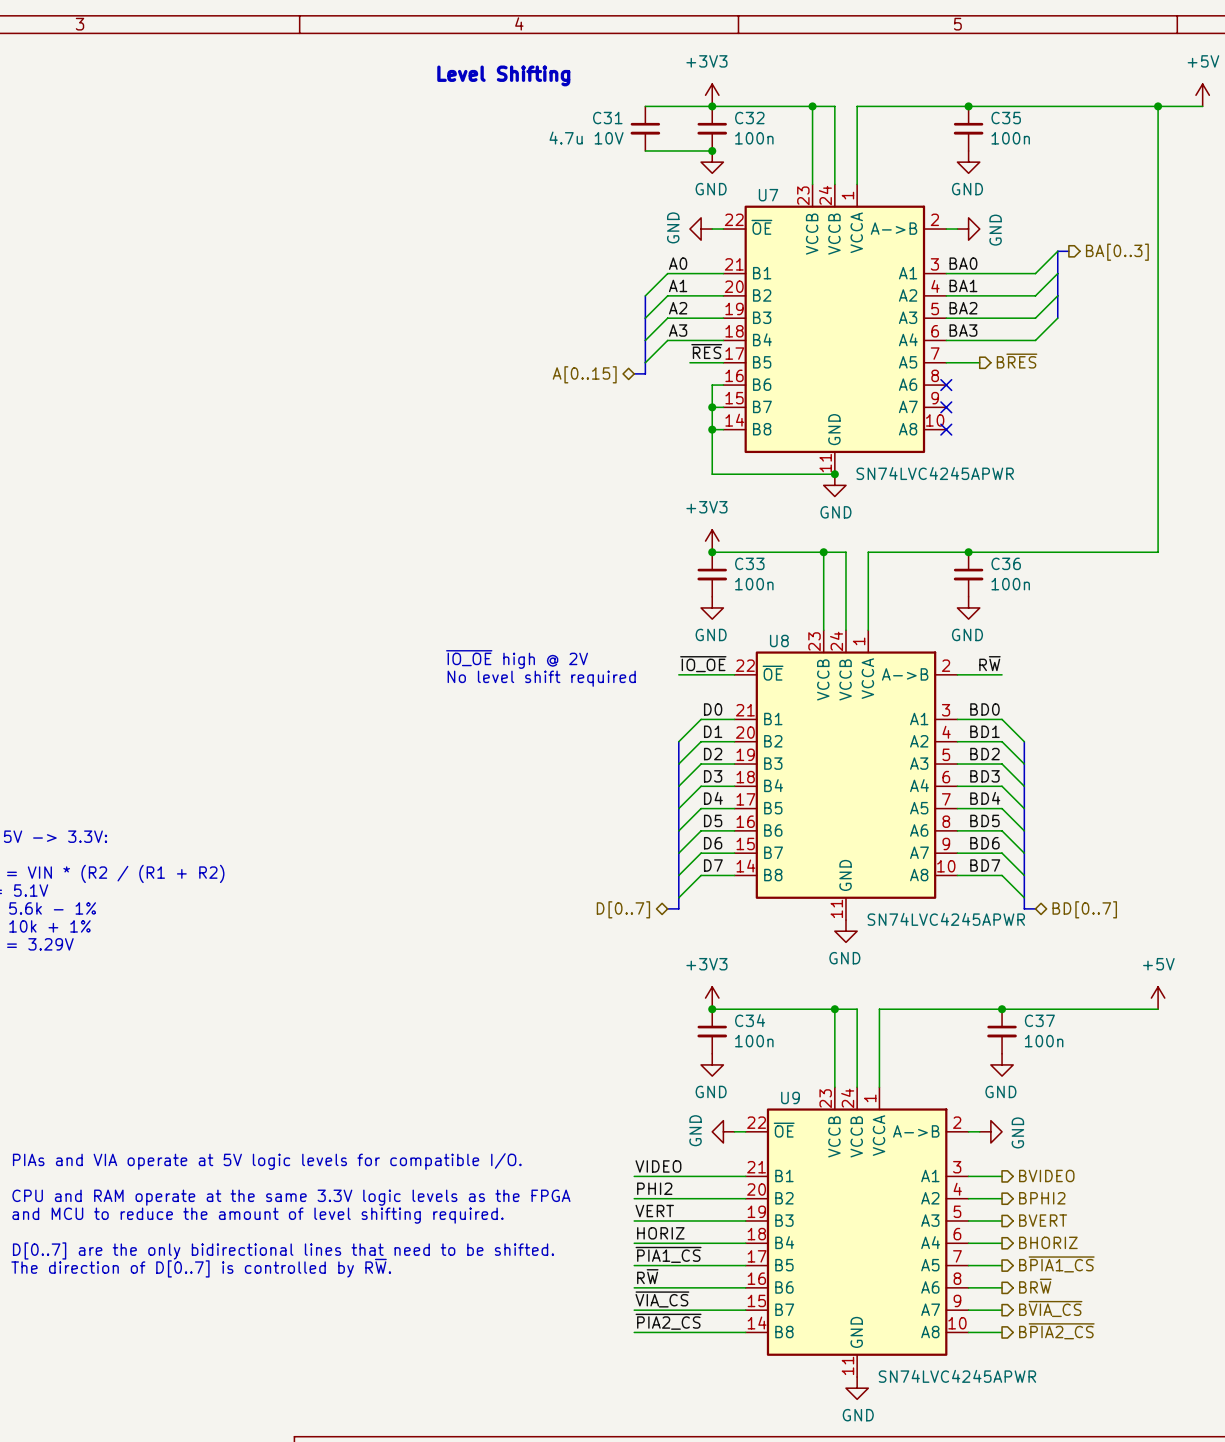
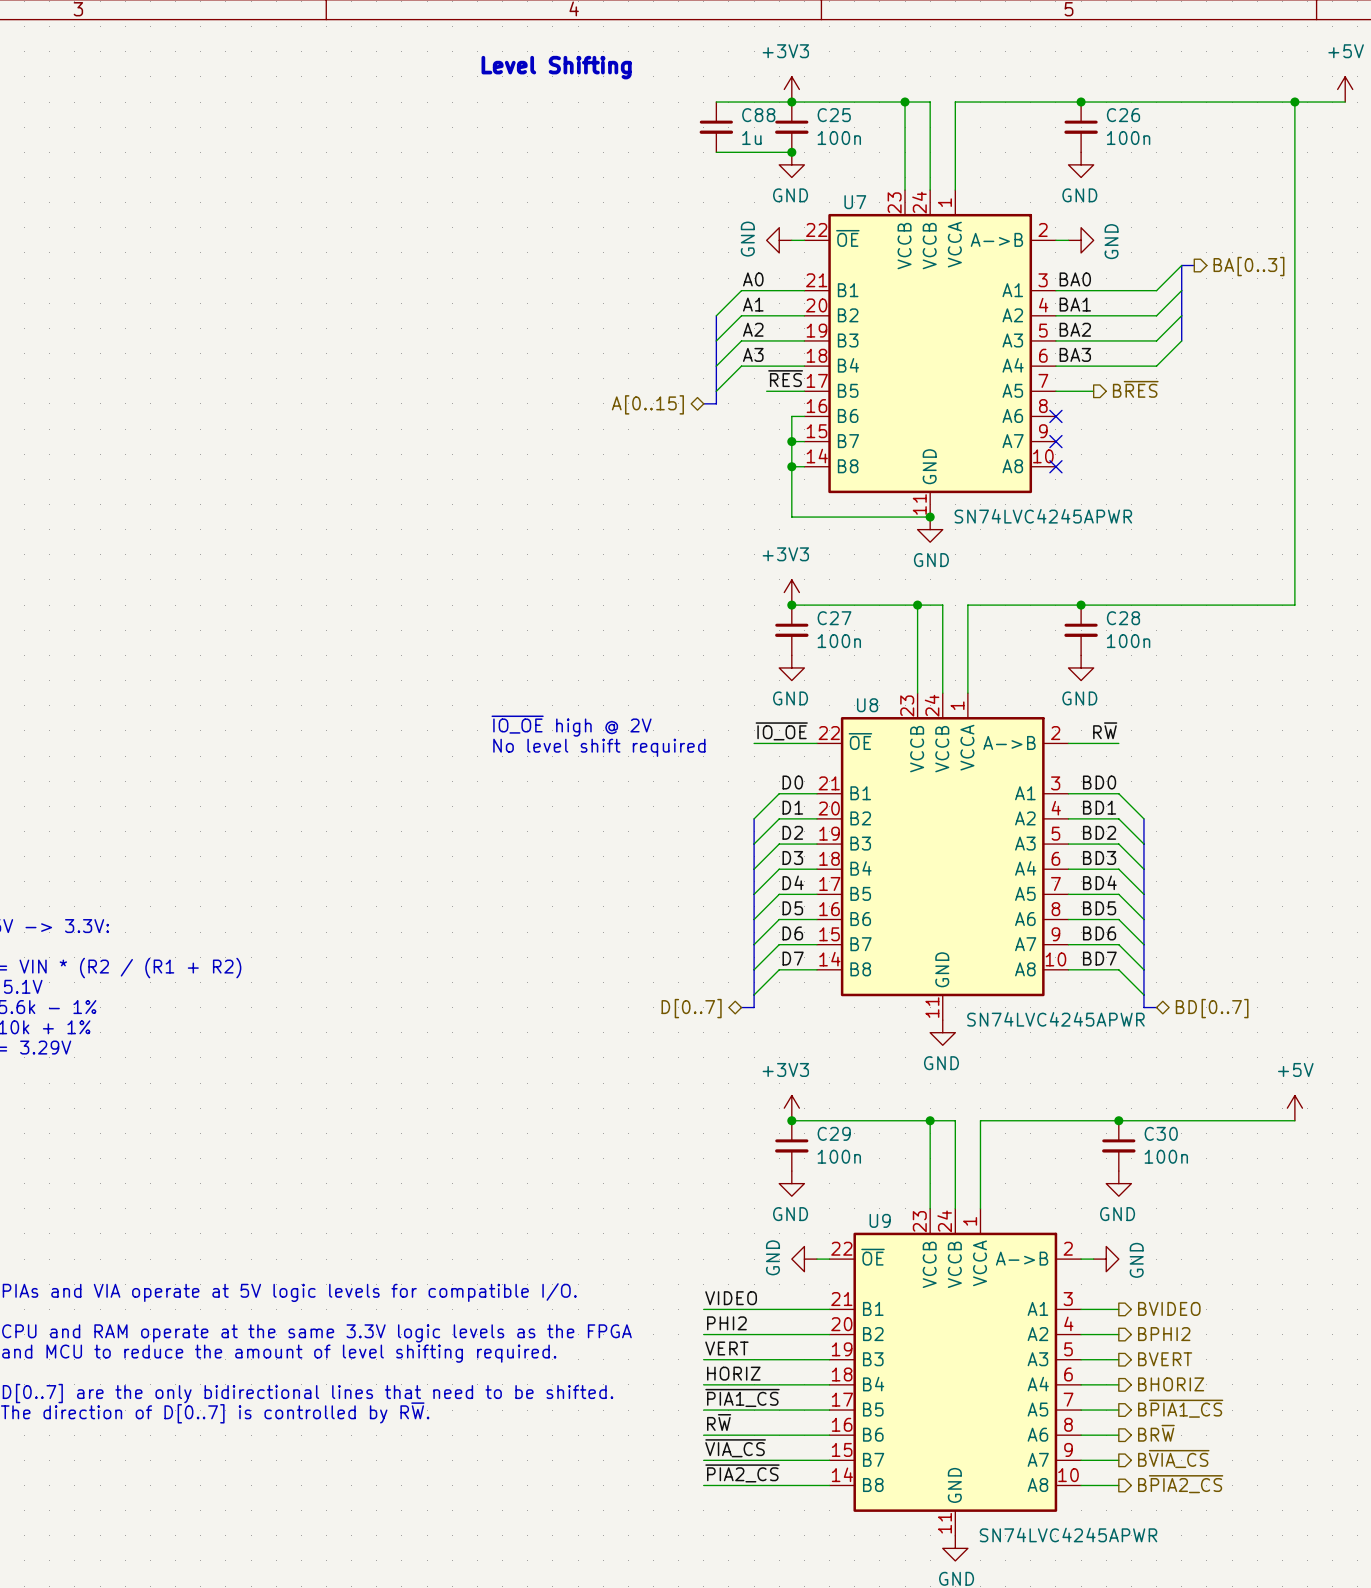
C31 name: C31 (607, 118) -> C88 (758, 115)
C32 name: C32 (749, 118) -> C25 (834, 115)
C35 name: C35 (1006, 118) -> C26 (1123, 115)
C31 value: 4.7u 10V (586, 138) -> 1u (751, 138)
C33 name: C33 (749, 563) -> C27 (834, 618)
C36 name: C36 (1006, 563) -> C28 (1123, 618)
C34 name: C34 (750, 1020) -> C29 (834, 1133)
C37 name: C37 (1039, 1020) -> C30 (1161, 1133)

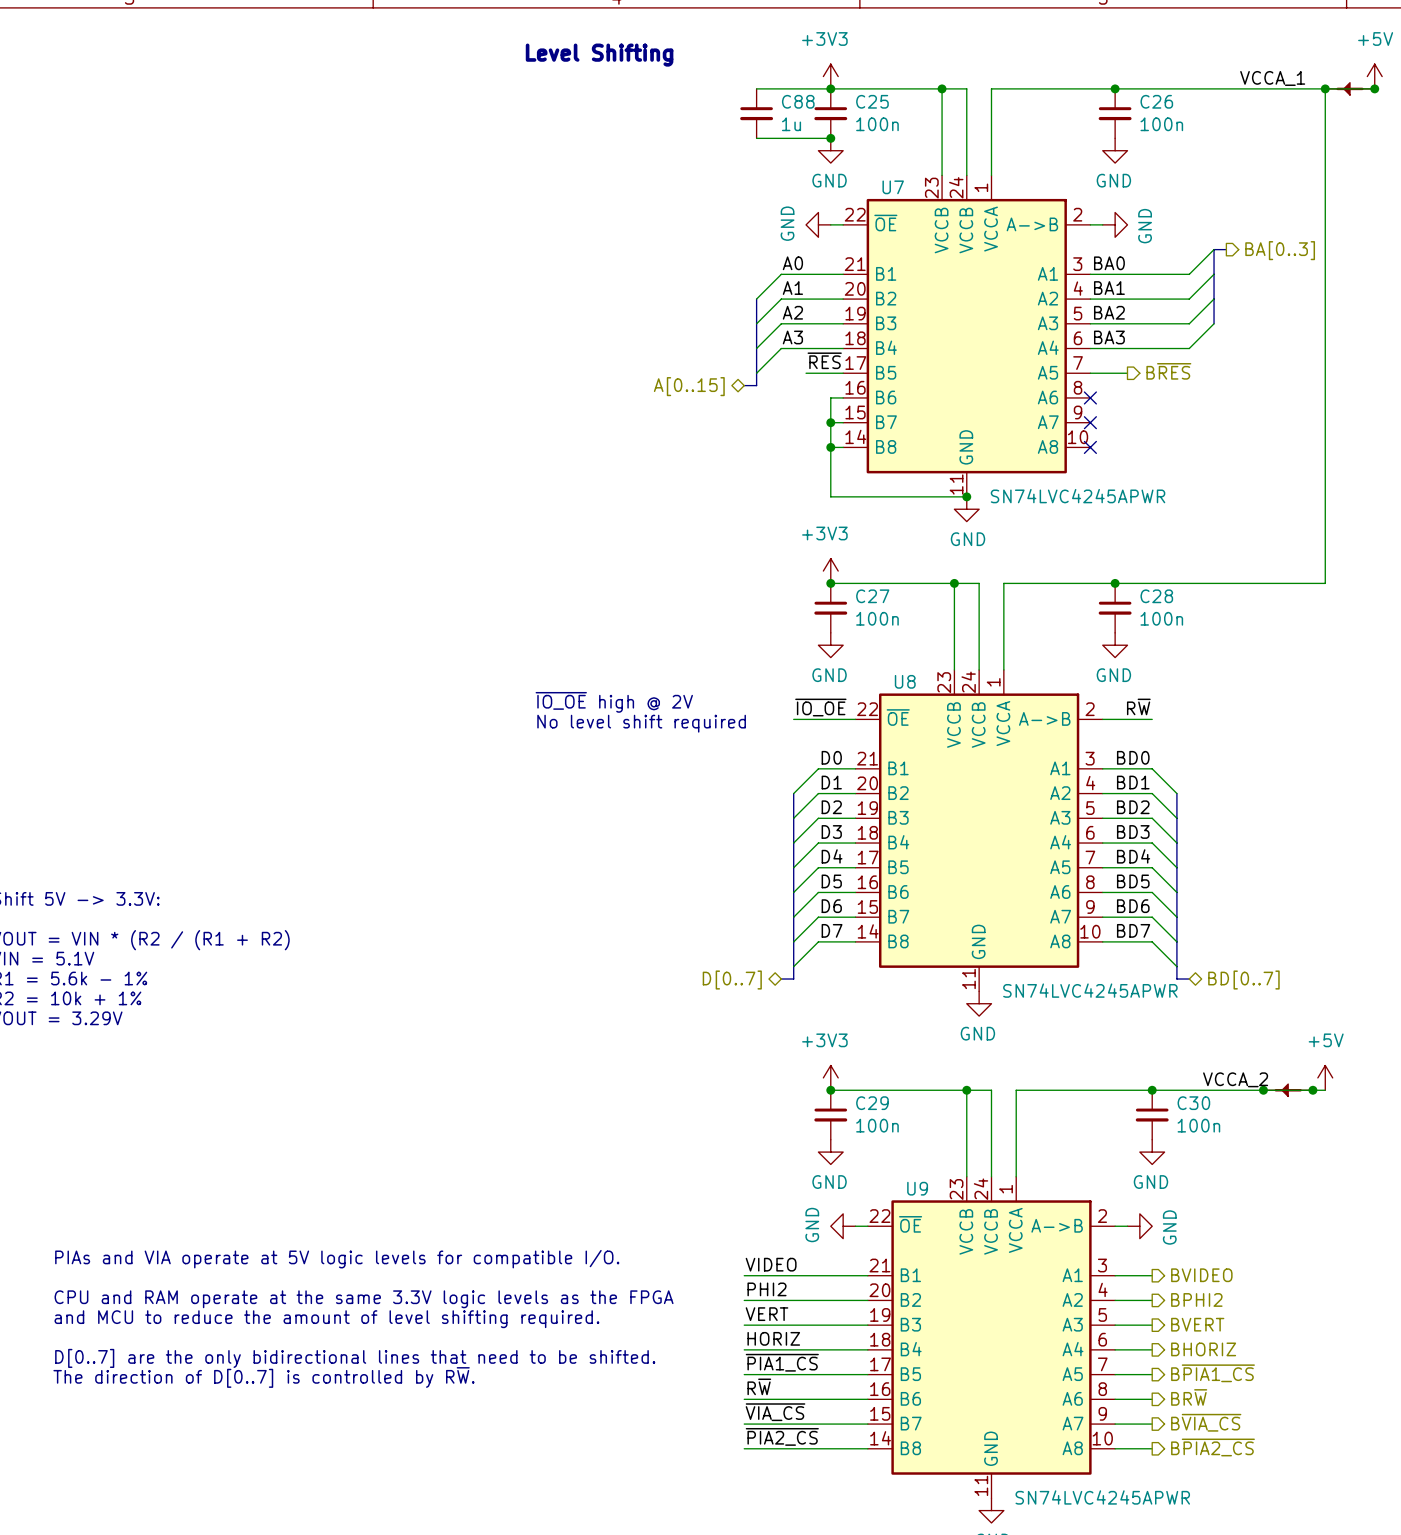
label: none -> VCCA_1 (1272, 78)
part: none -> (1350, 88)
junction: none -> (1374, 88)
label: none -> VCCA_2 (1235, 1079)
junction: none -> (1263, 1090)
part: none -> (1288, 1090)
junction: none -> (1312, 1090)

